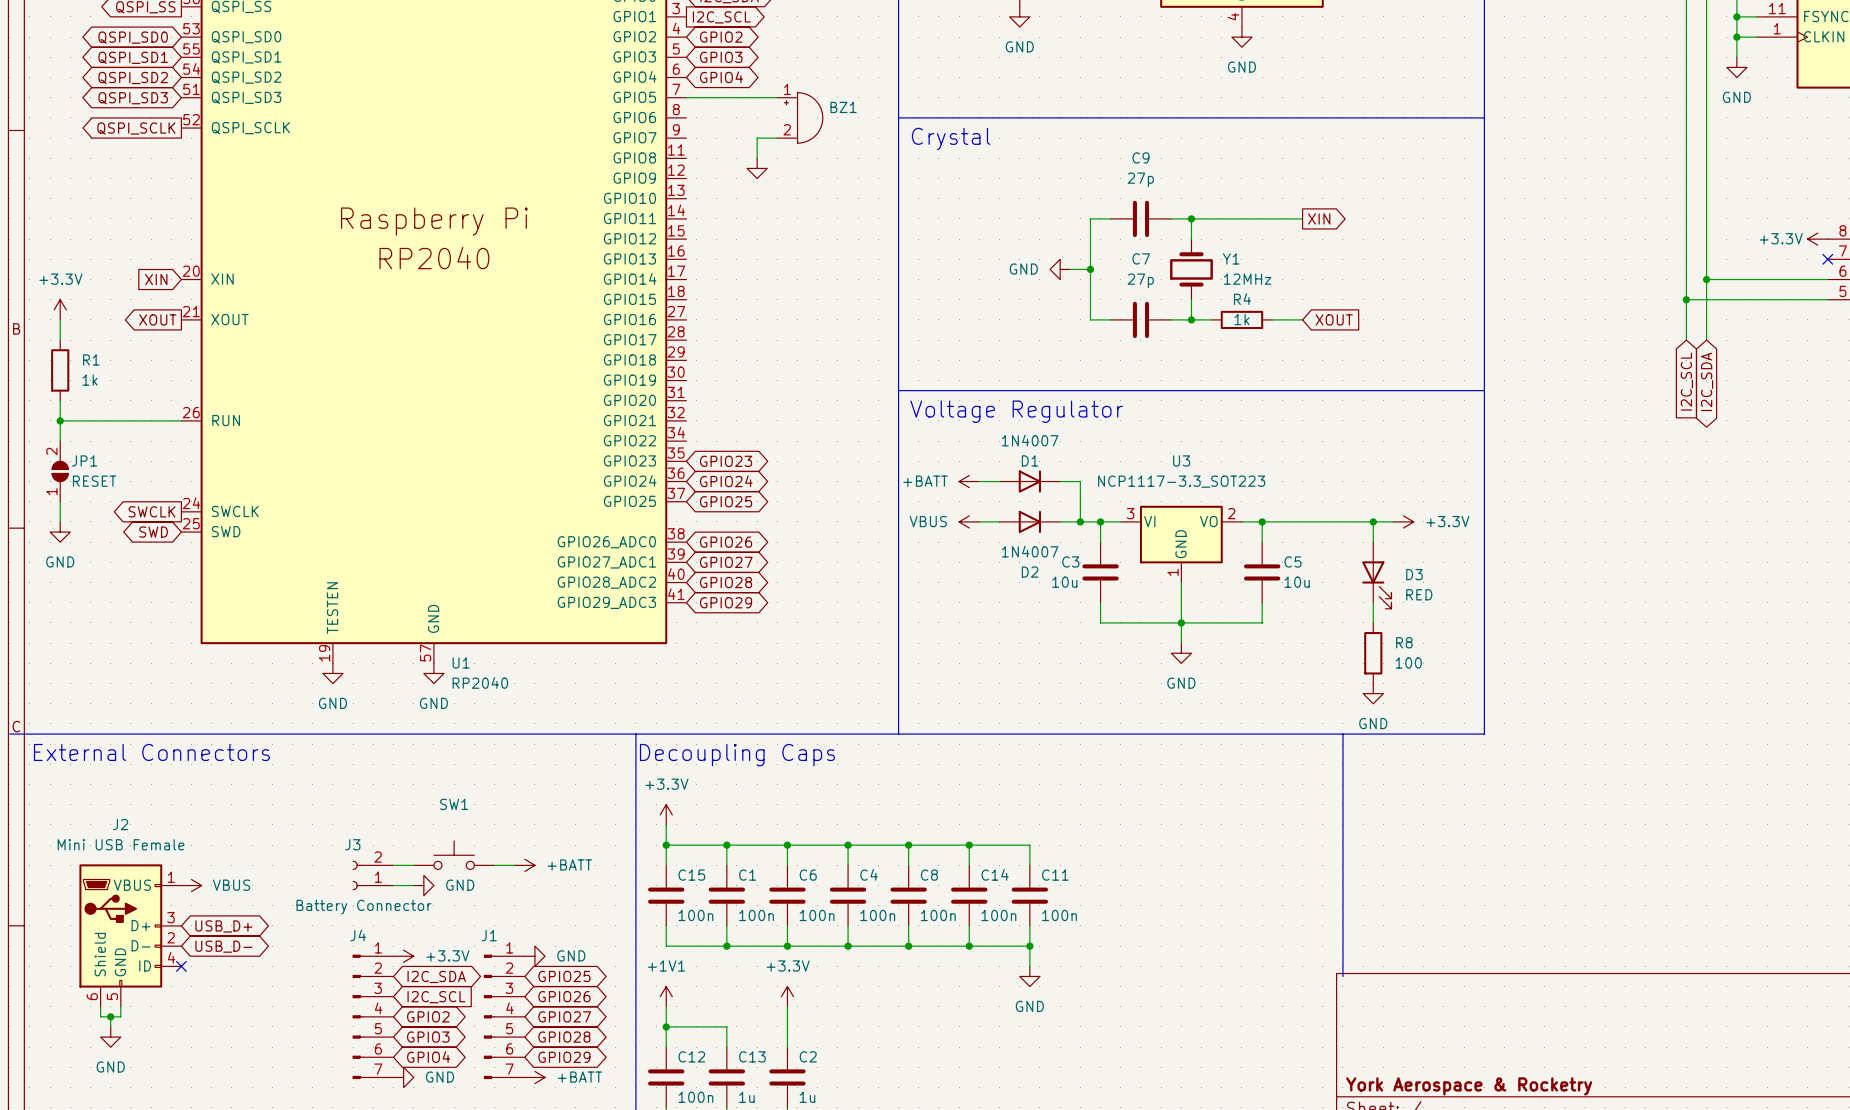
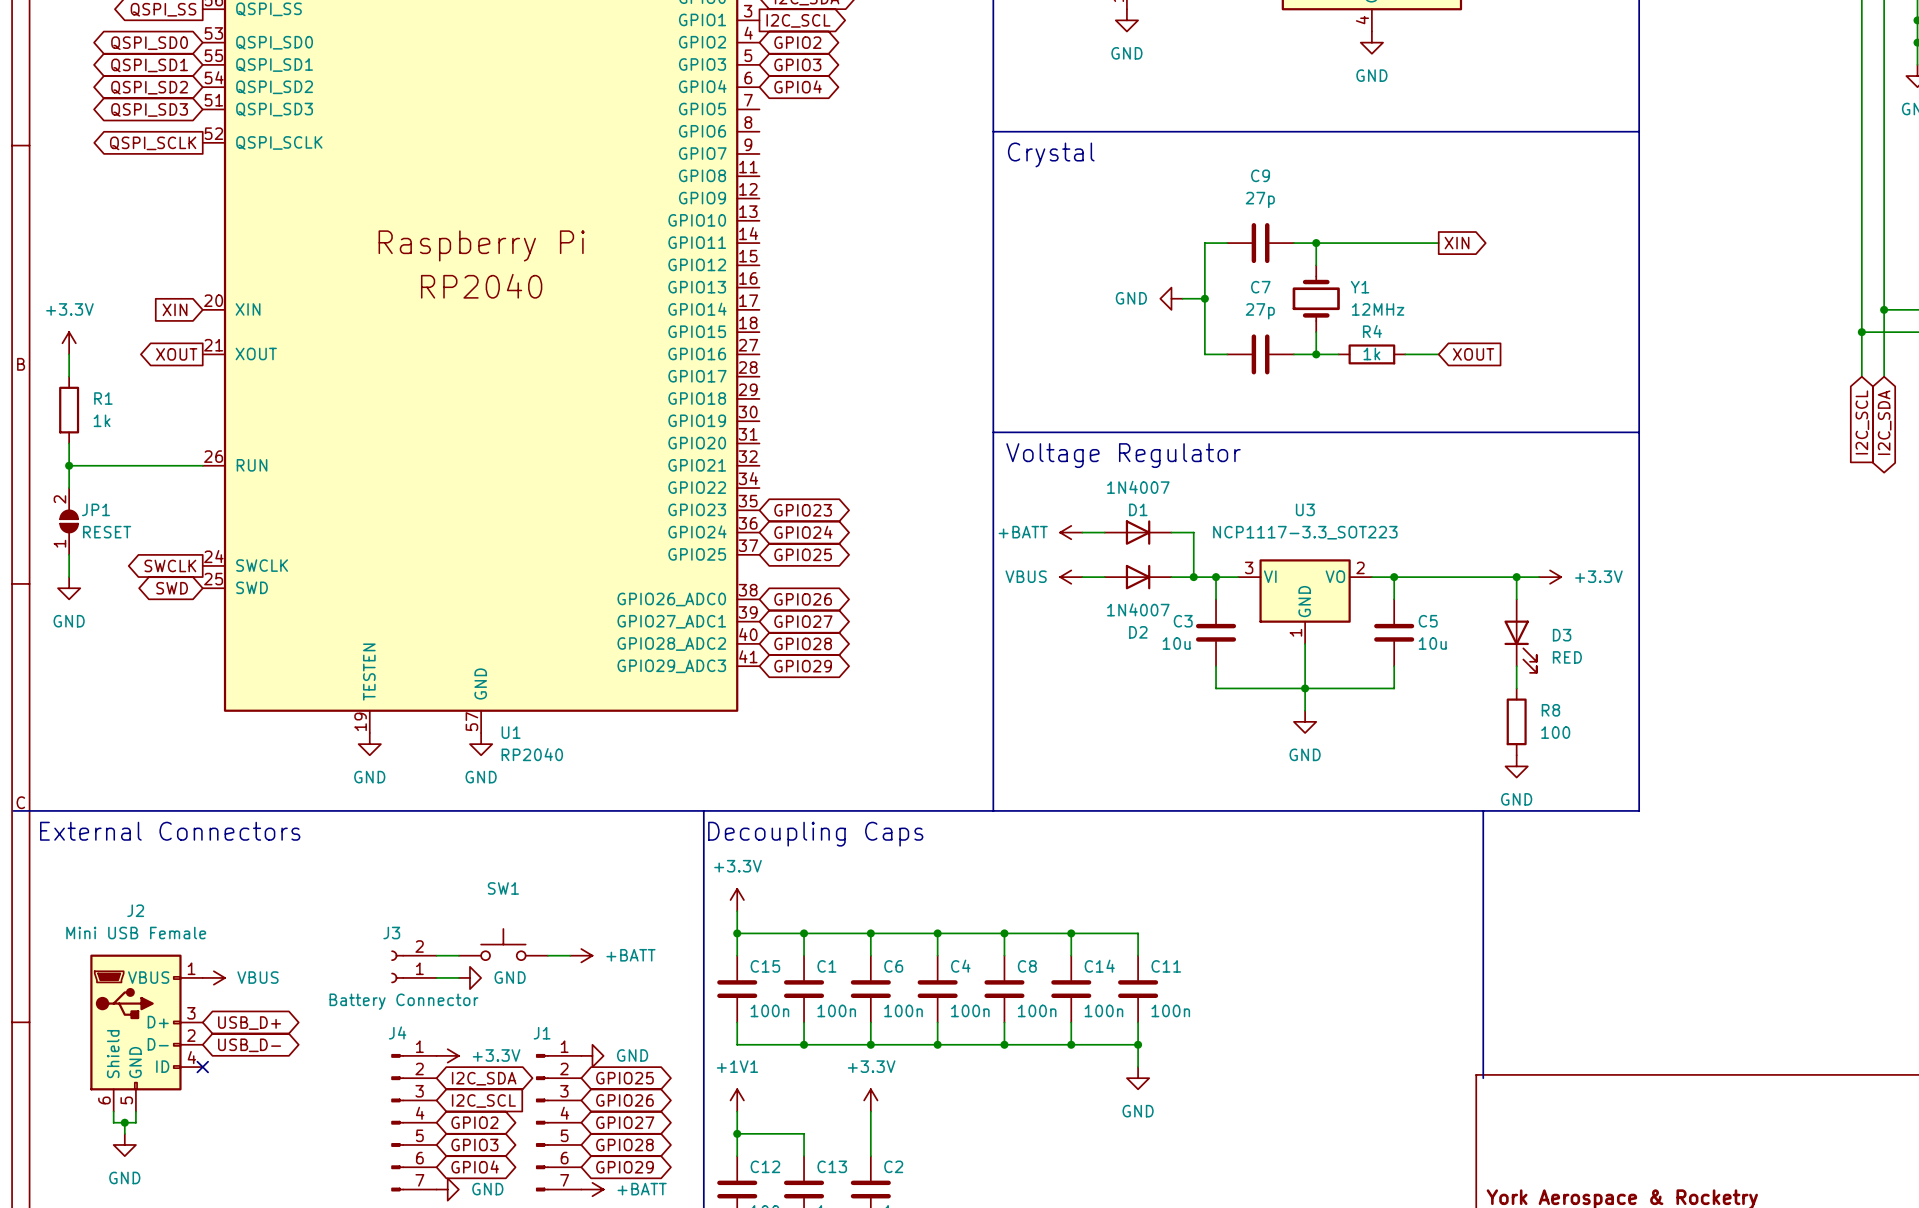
wire: (686, 97) (777, 97) -> none
BZ1: (800, 117) -> none
wire: (777, 138) (757, 138) (757, 158) -> none
power symbol: (757, 168) -> none

